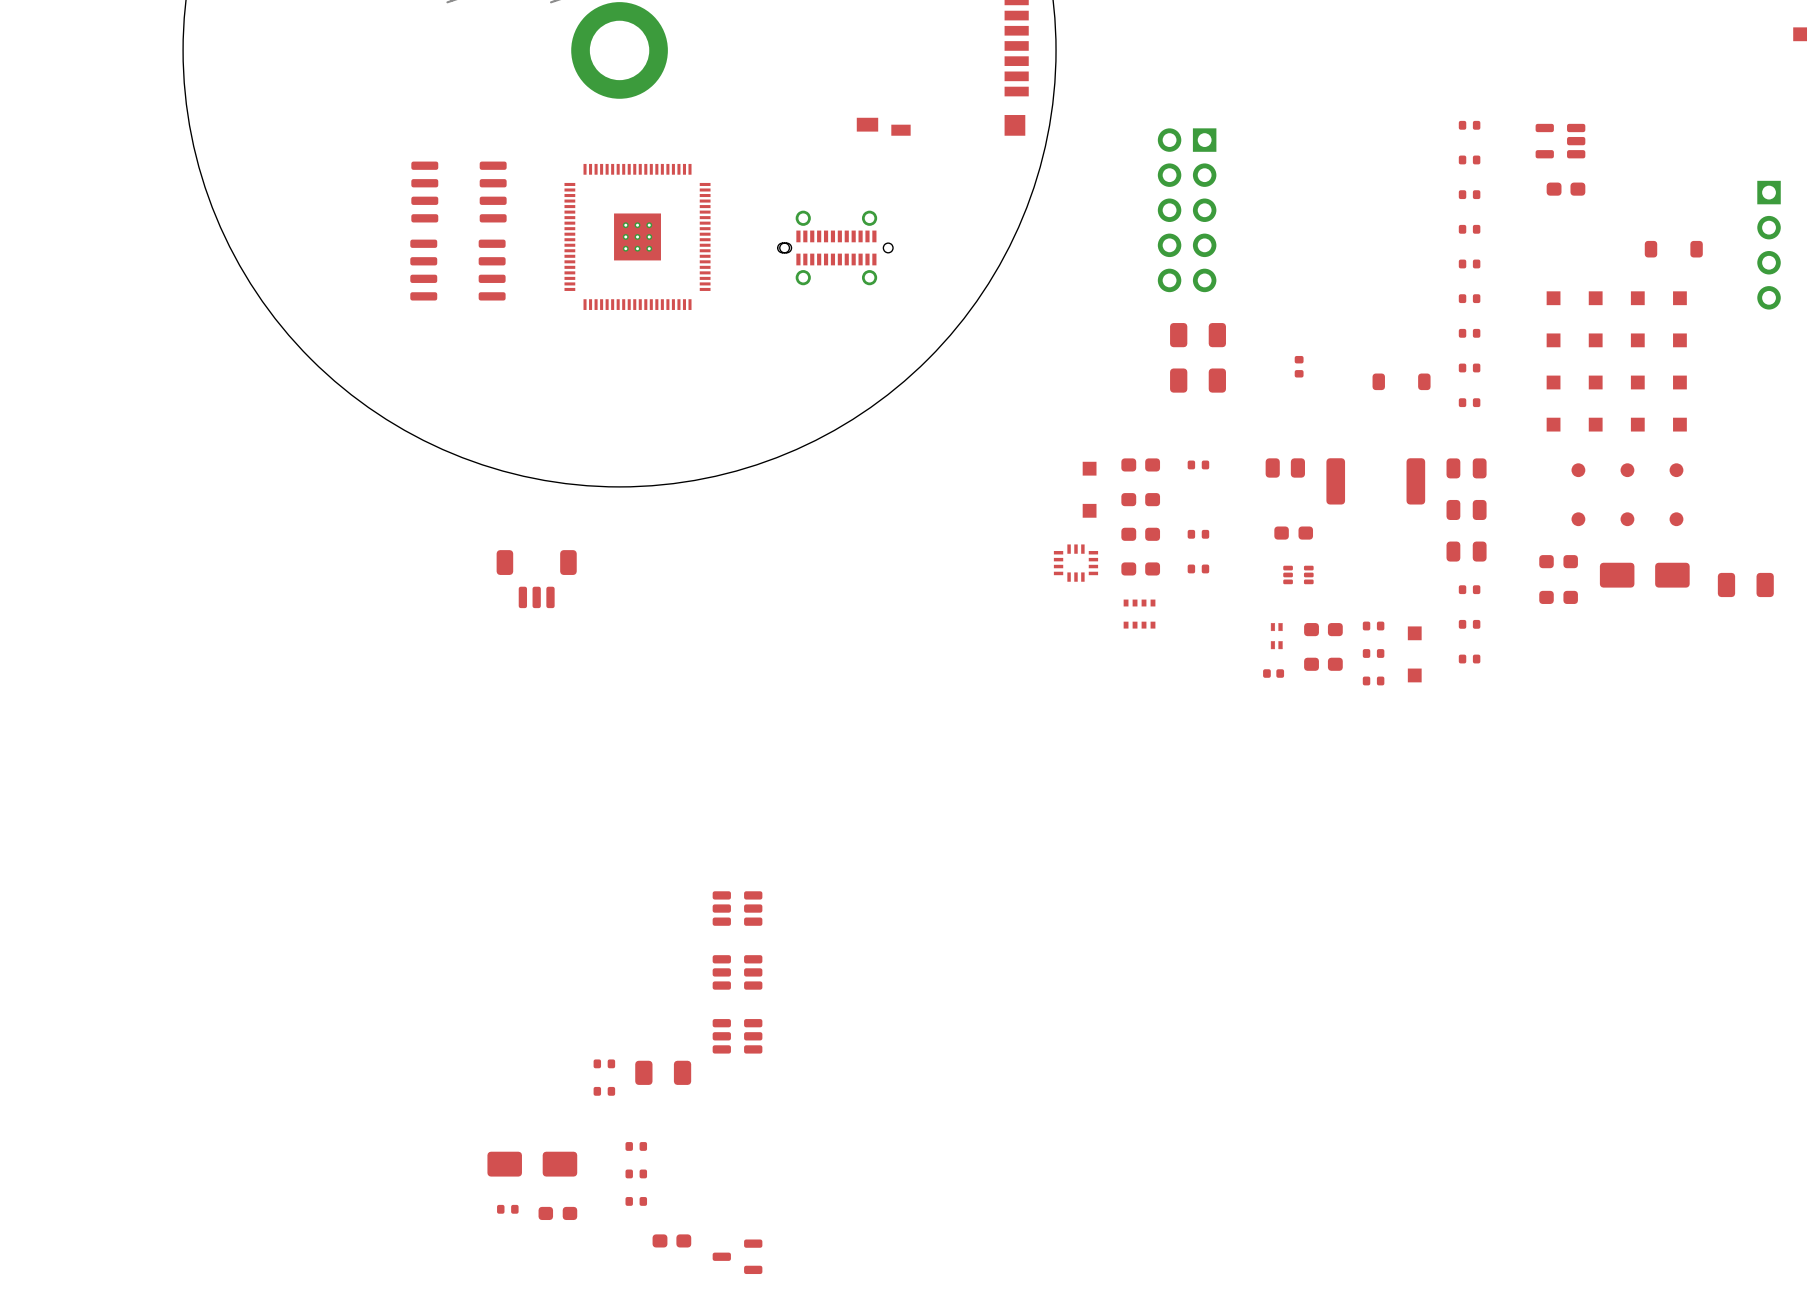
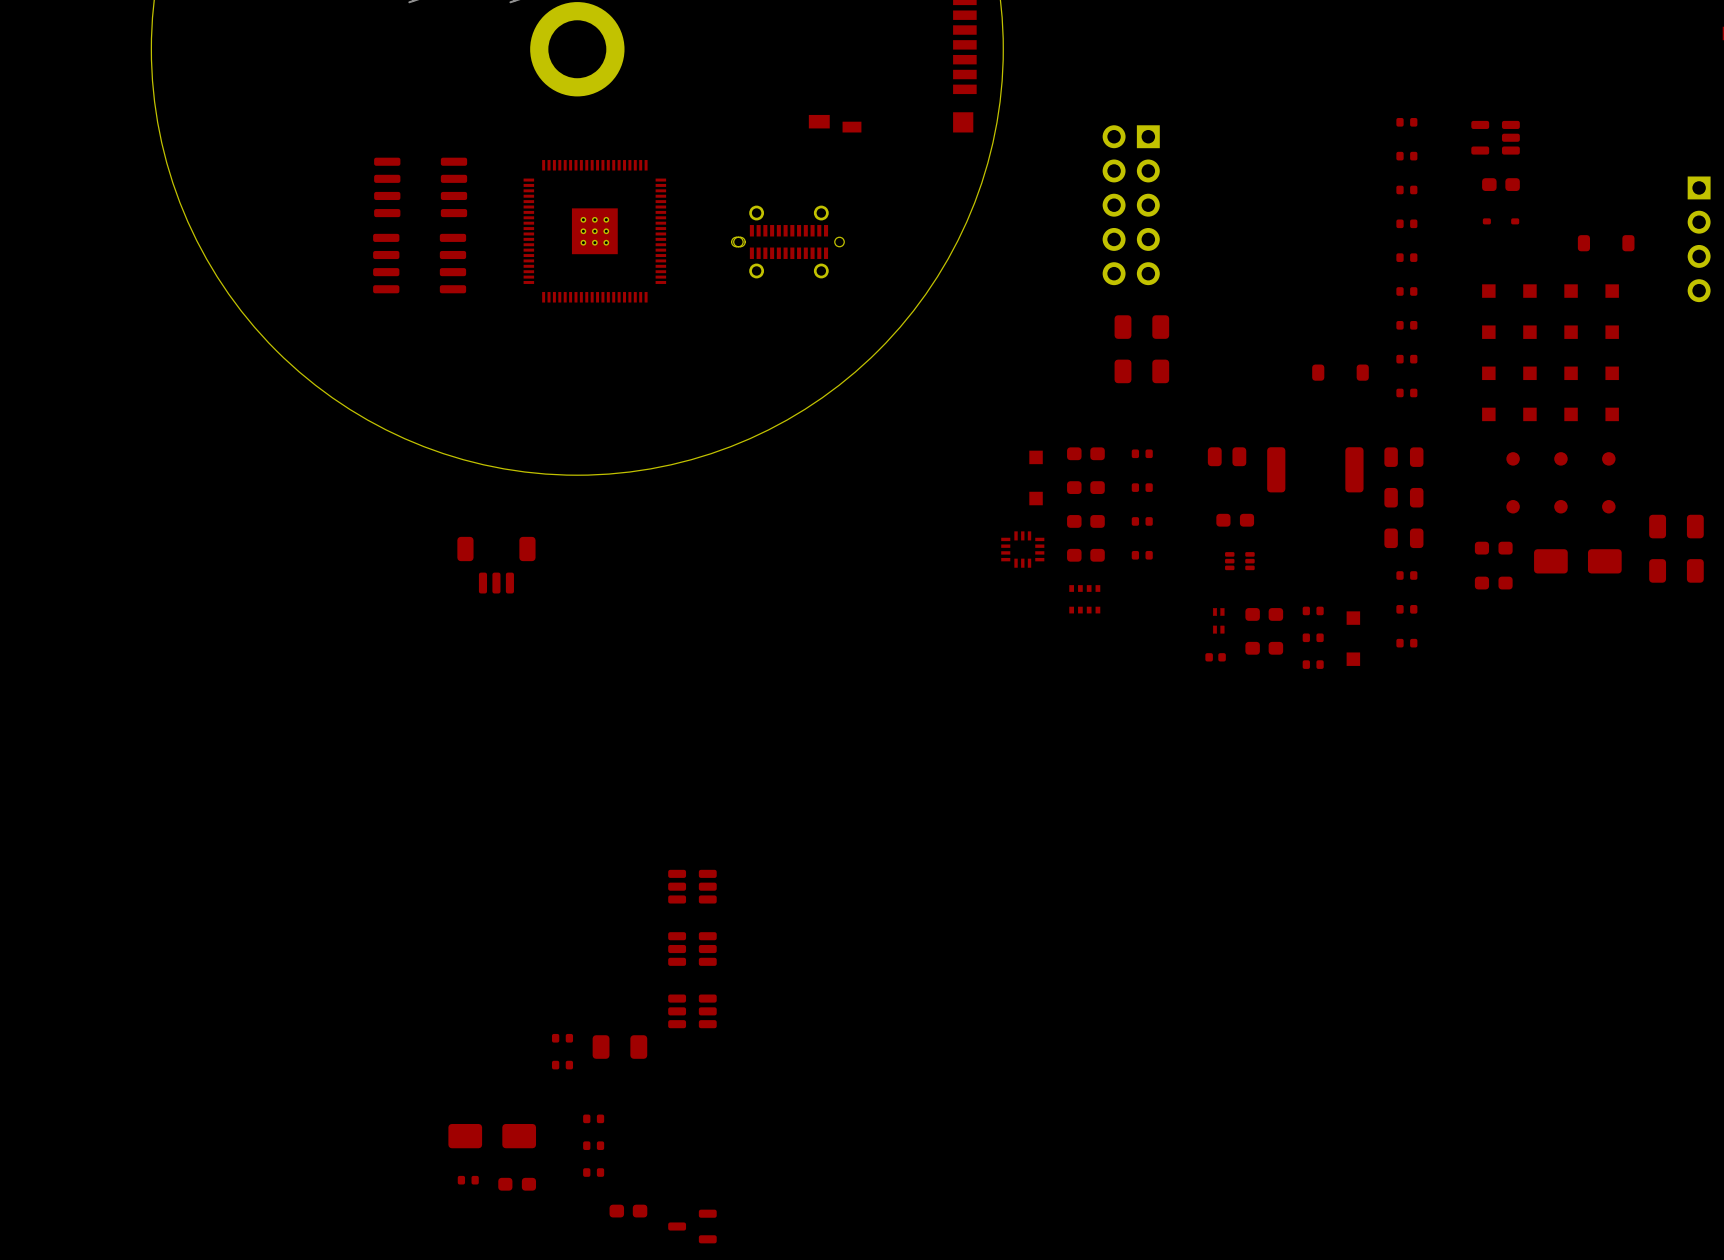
part: none -> (1501, 221)
part rotation: 0° (1299, 366) -> 90° clockwise (1142, 487)
part position: (1299, 366) -> (1142, 487)
part: none -> (1676, 526)

